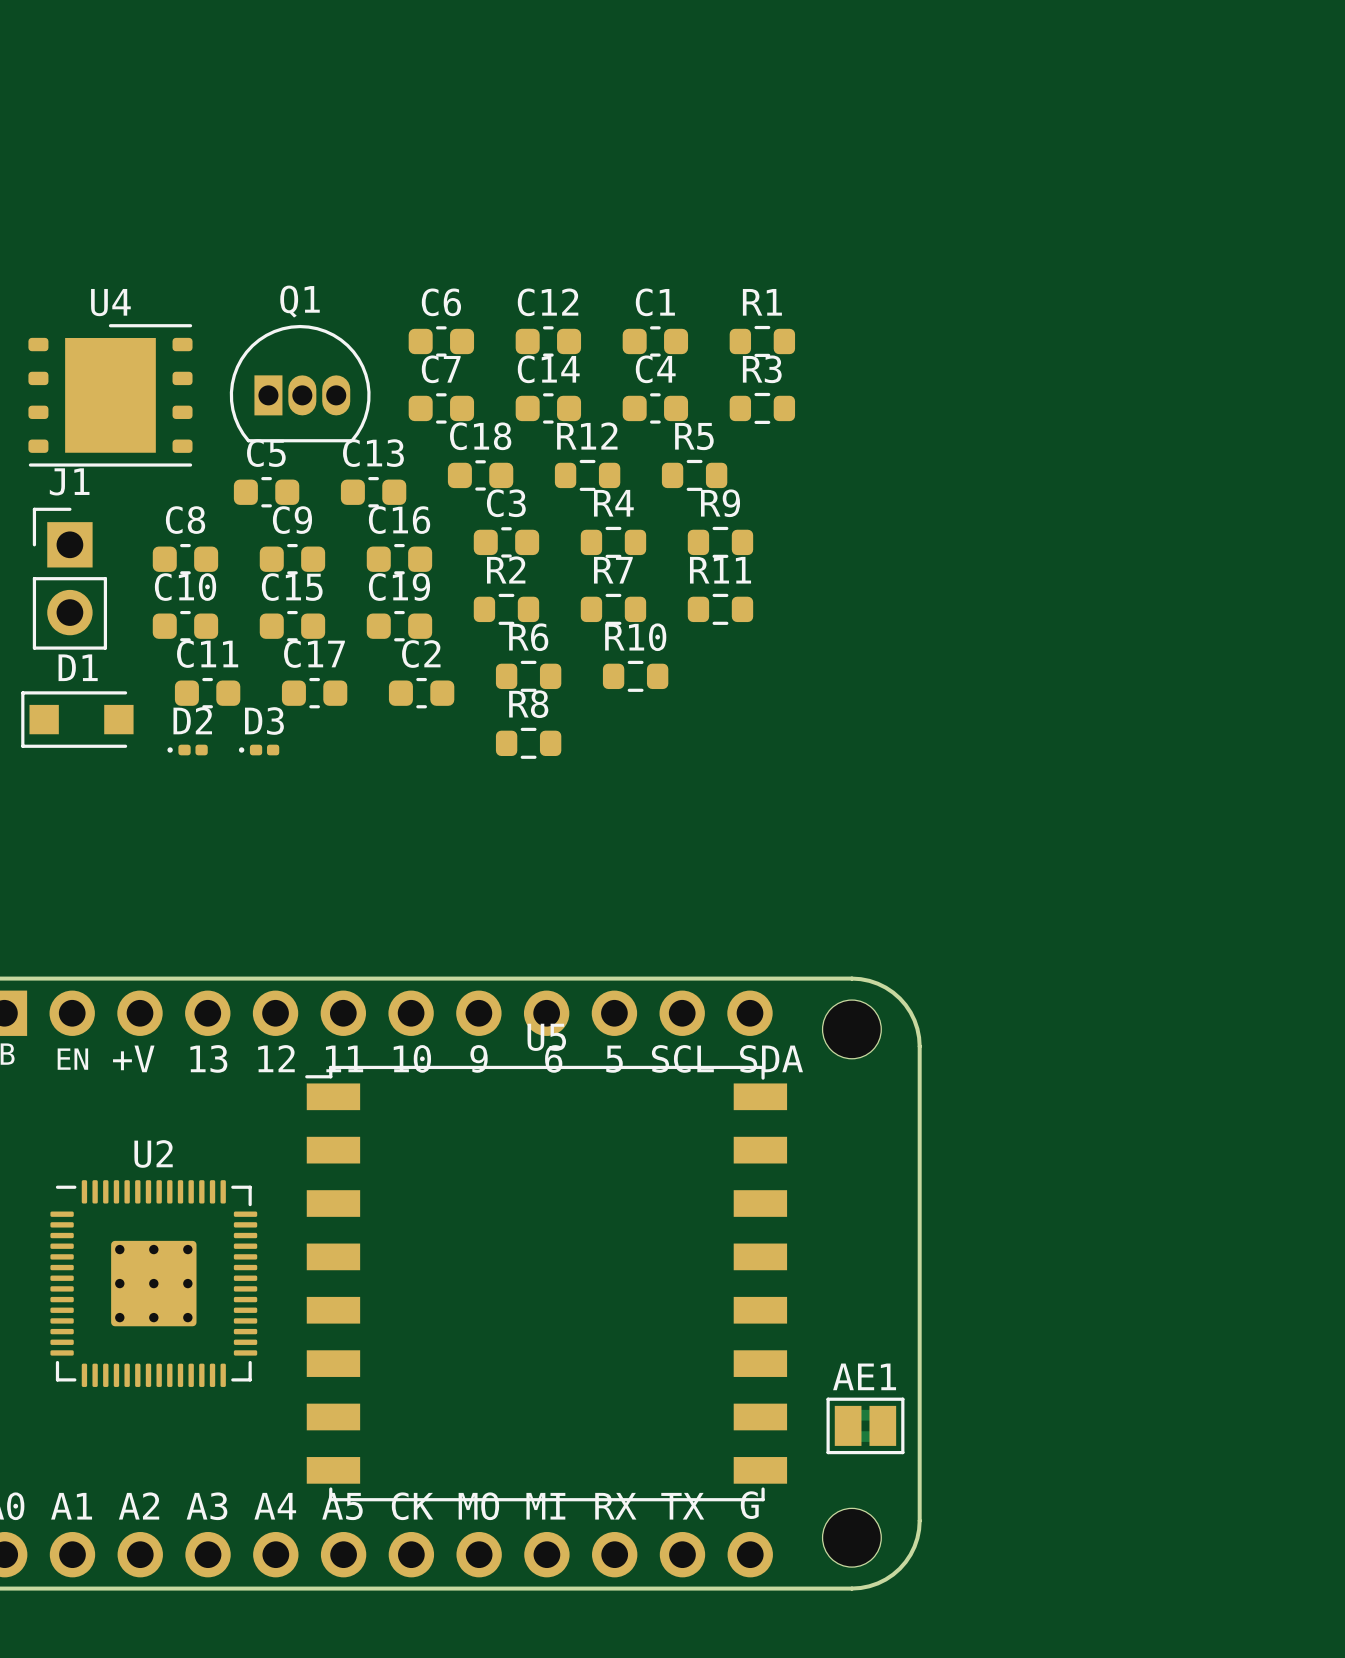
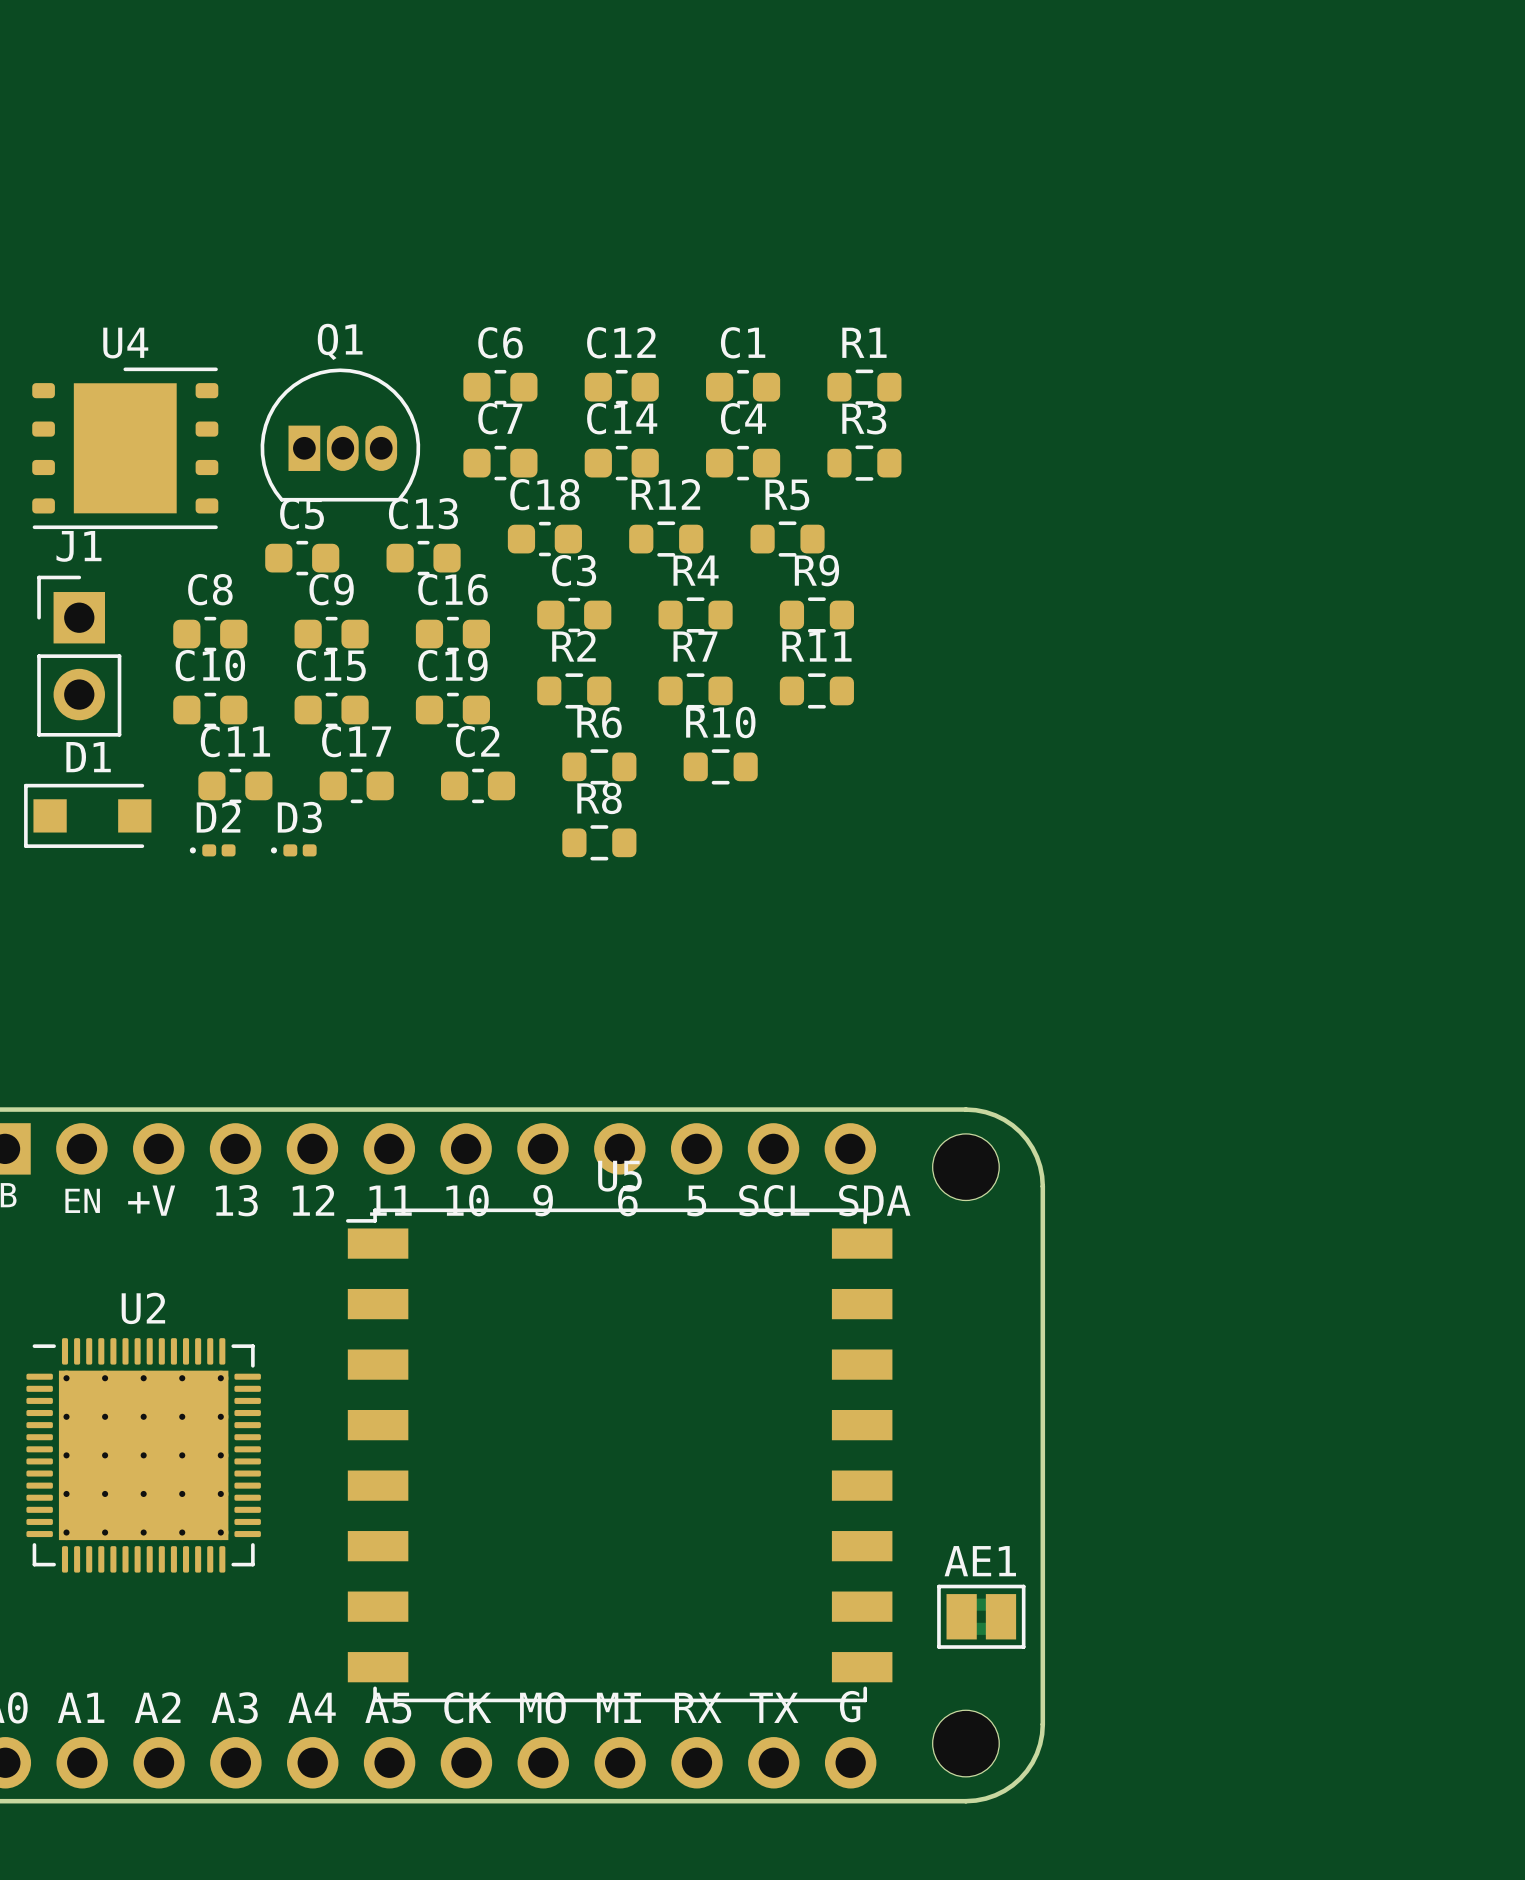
U2 footprint: [50, 1180, 258, 1387] -> [26, 1338, 261, 1573]

